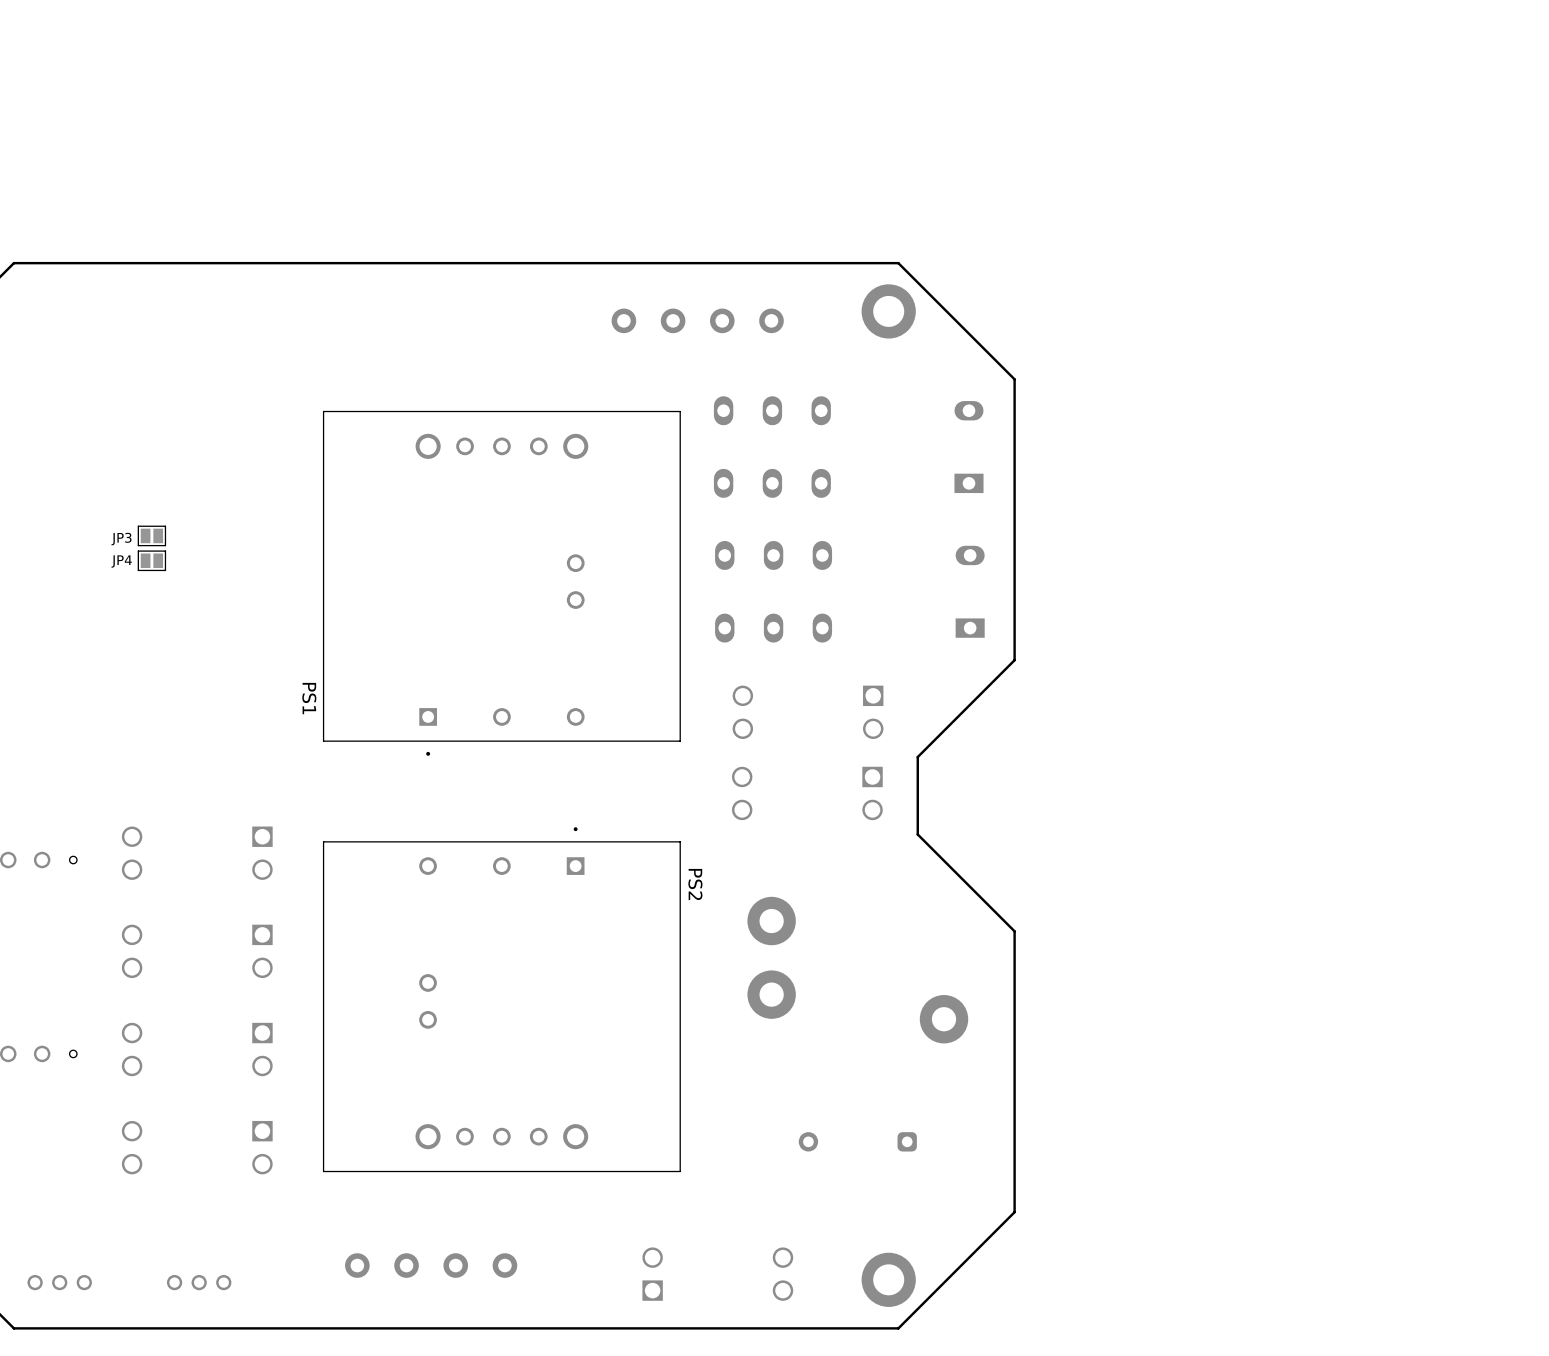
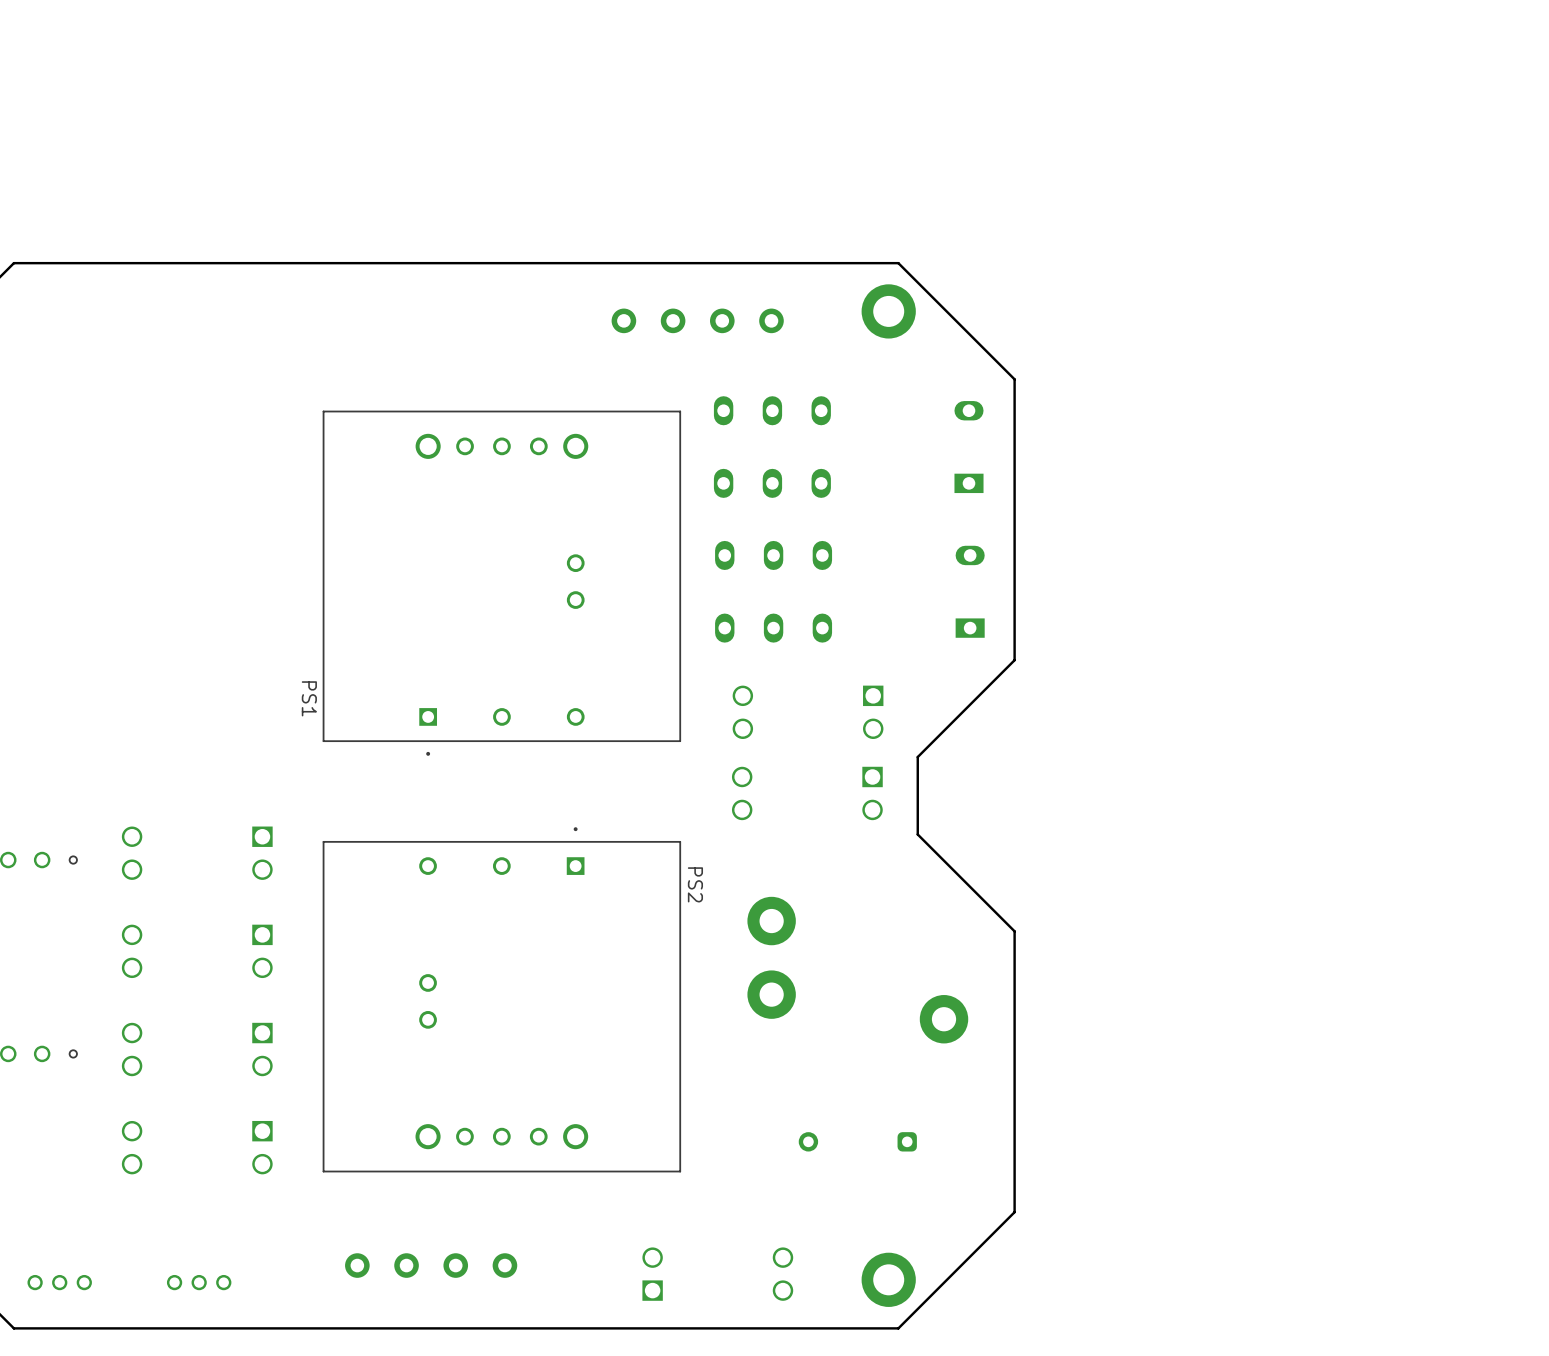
JP3: (151, 535) -> none
JP4: (151, 560) -> none

